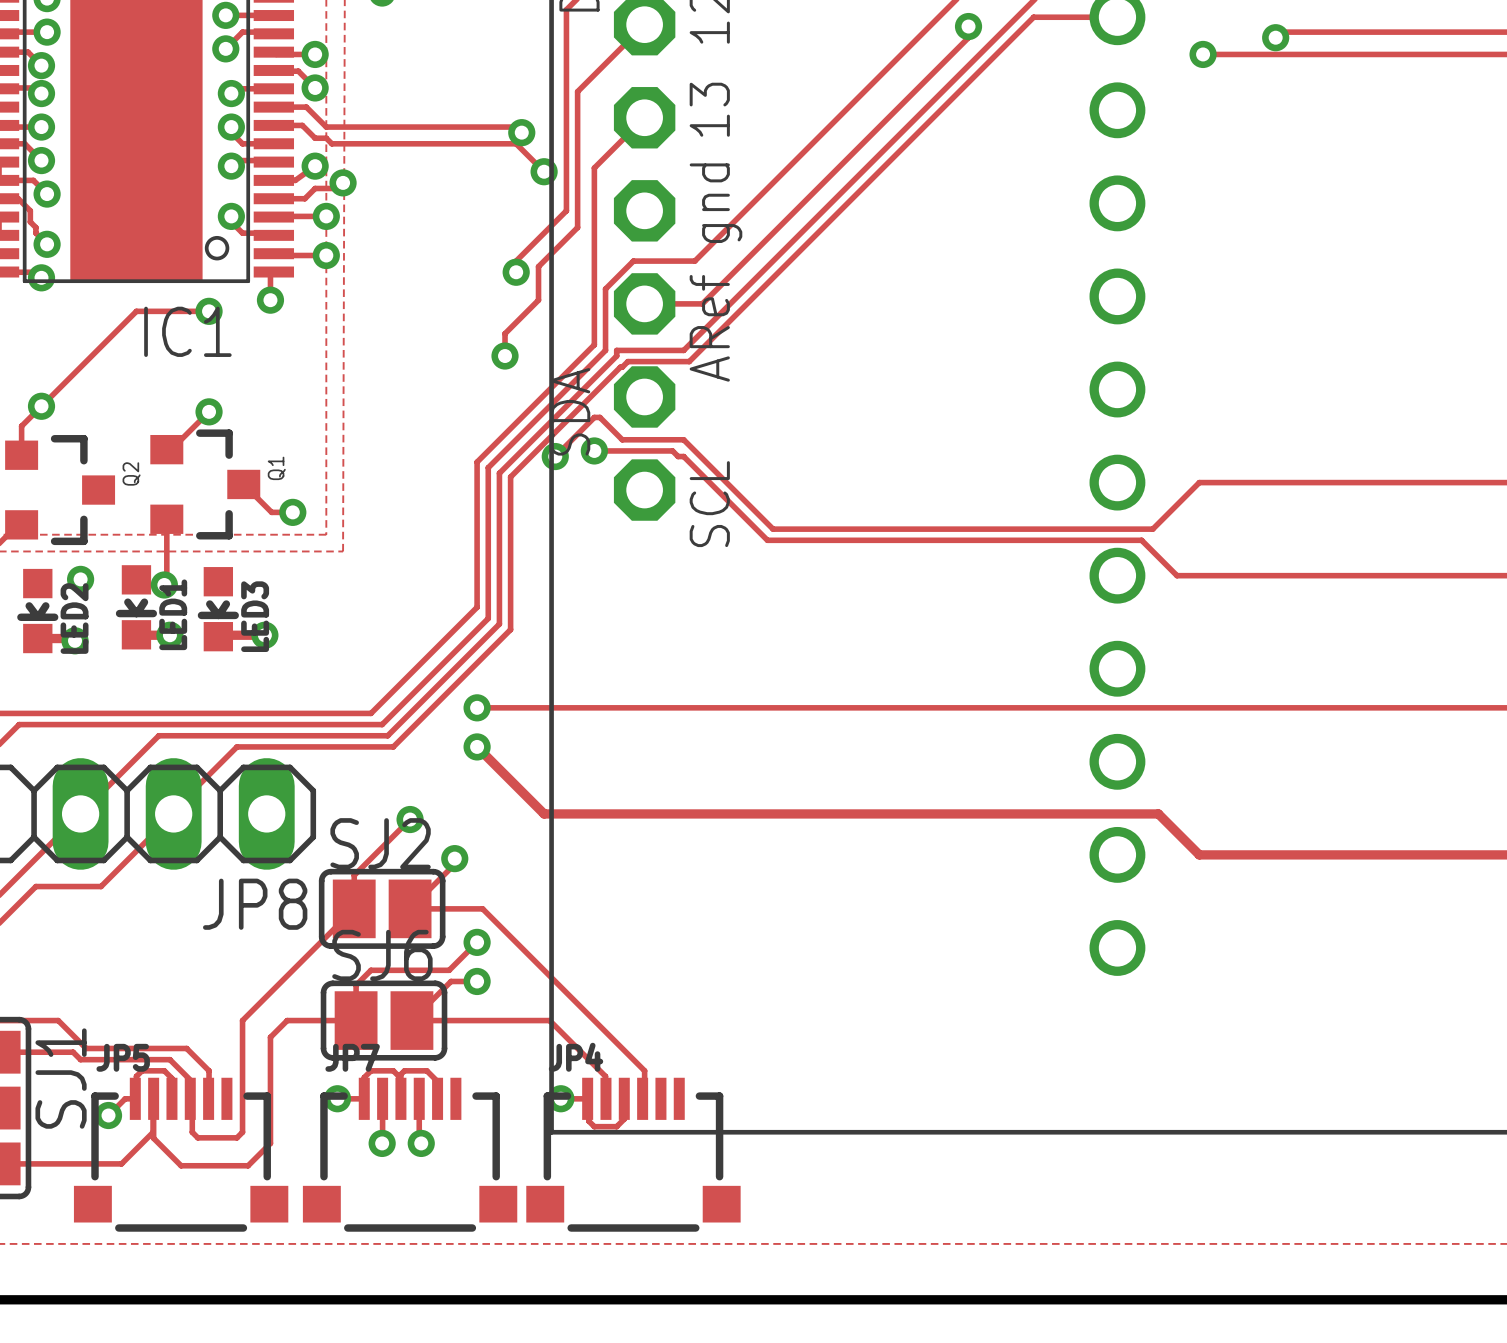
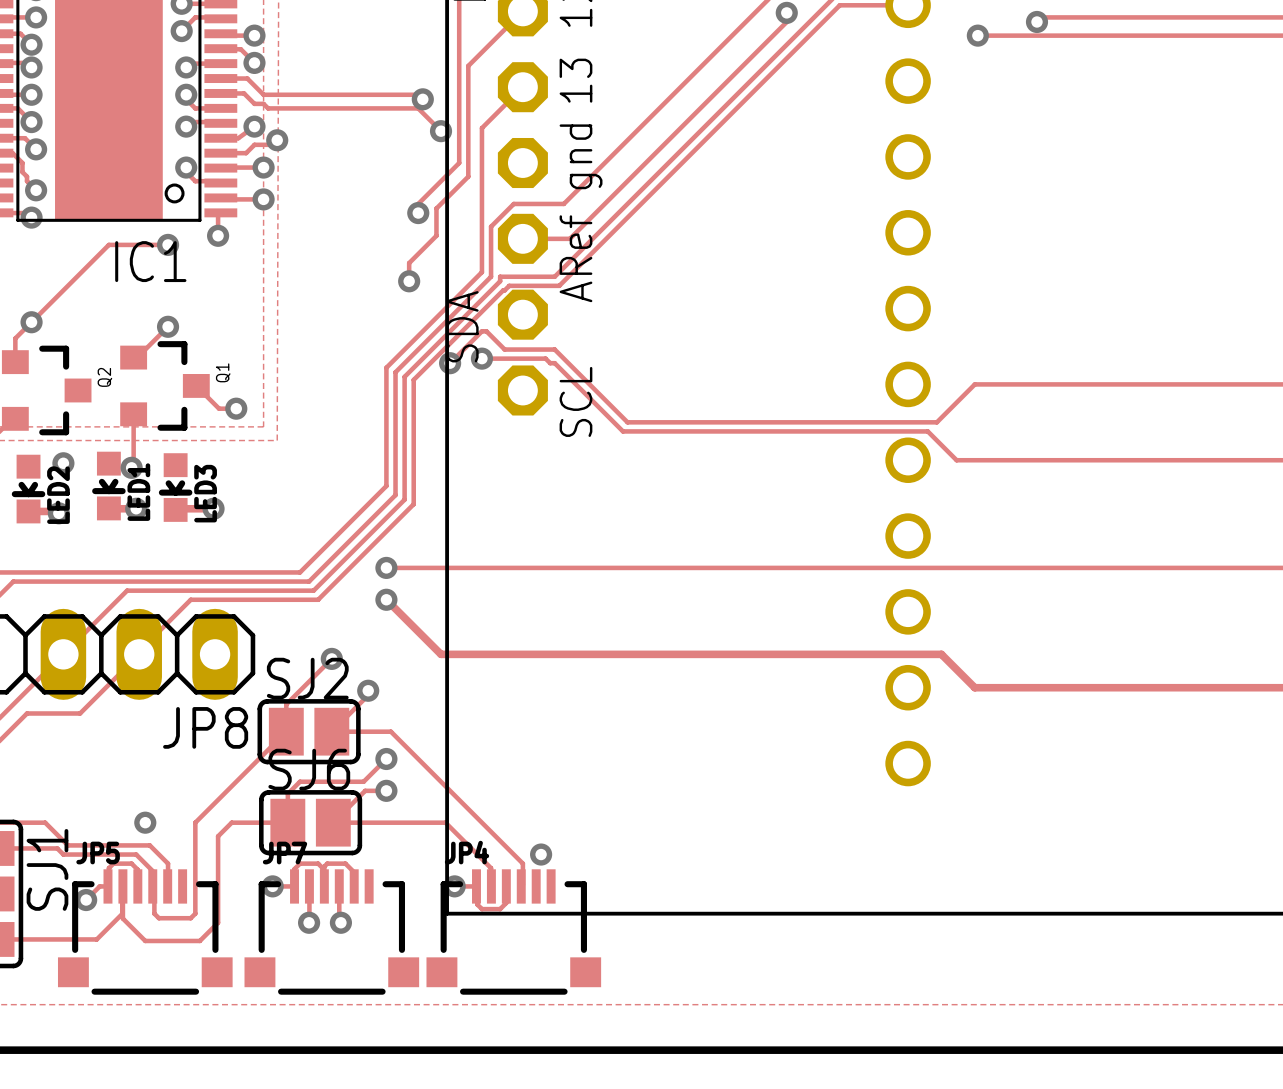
via: none -> (145, 822)
via: none -> (541, 854)

